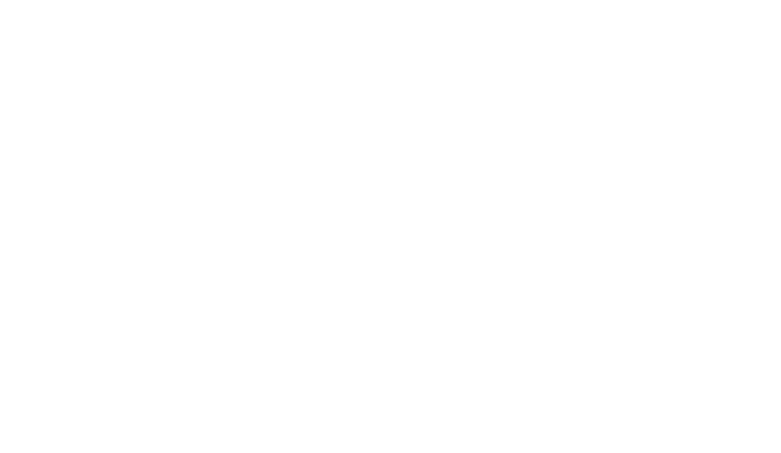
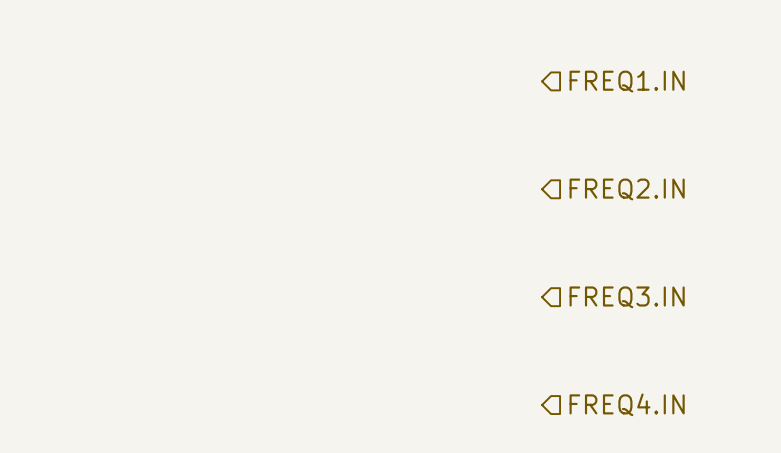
hierarchical label: none -> FREQ1.IN (627, 81)
hierarchical label: none -> FREQ2.IN (627, 189)
hierarchical label: none -> FREQ3.IN (627, 297)
hierarchical label: none -> FREQ4.IN (627, 404)

